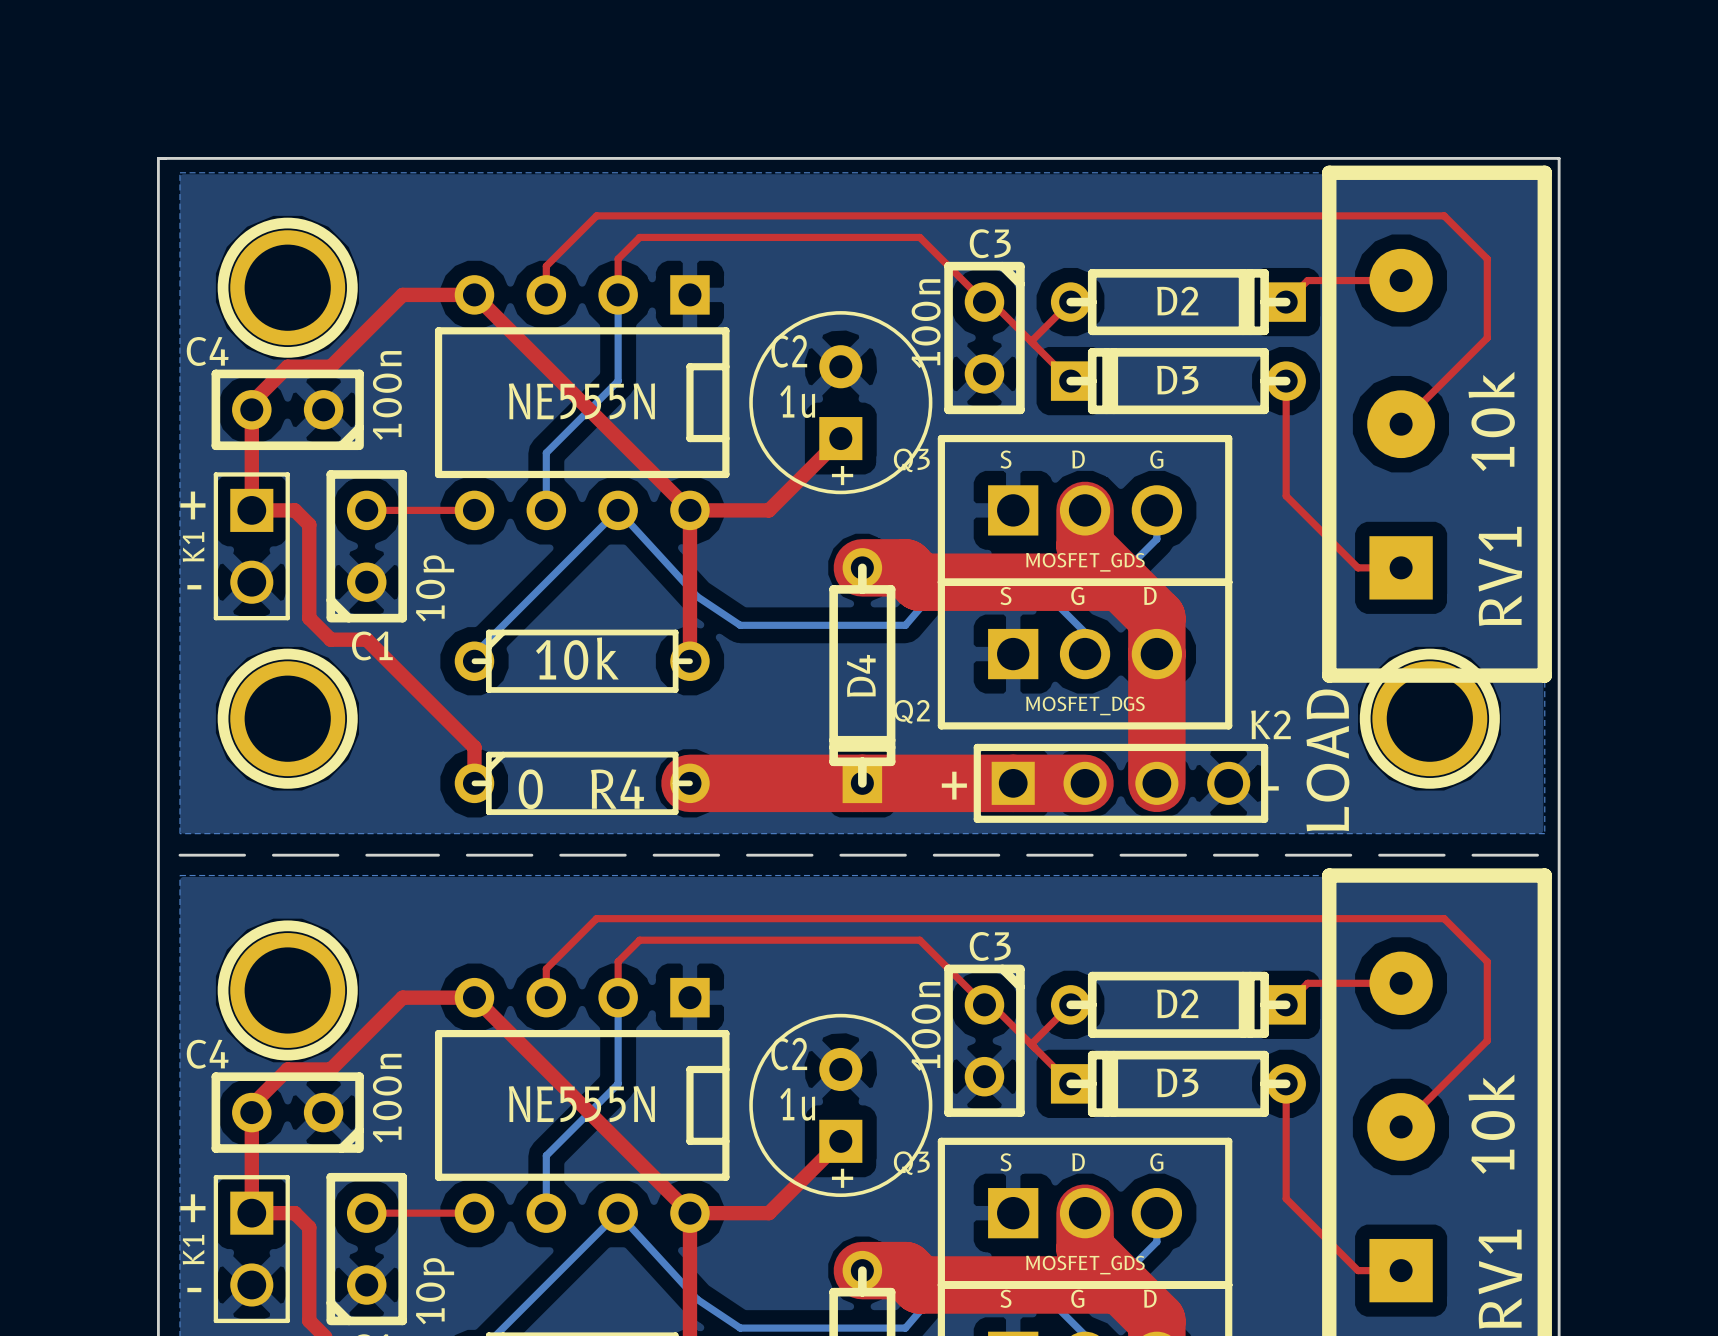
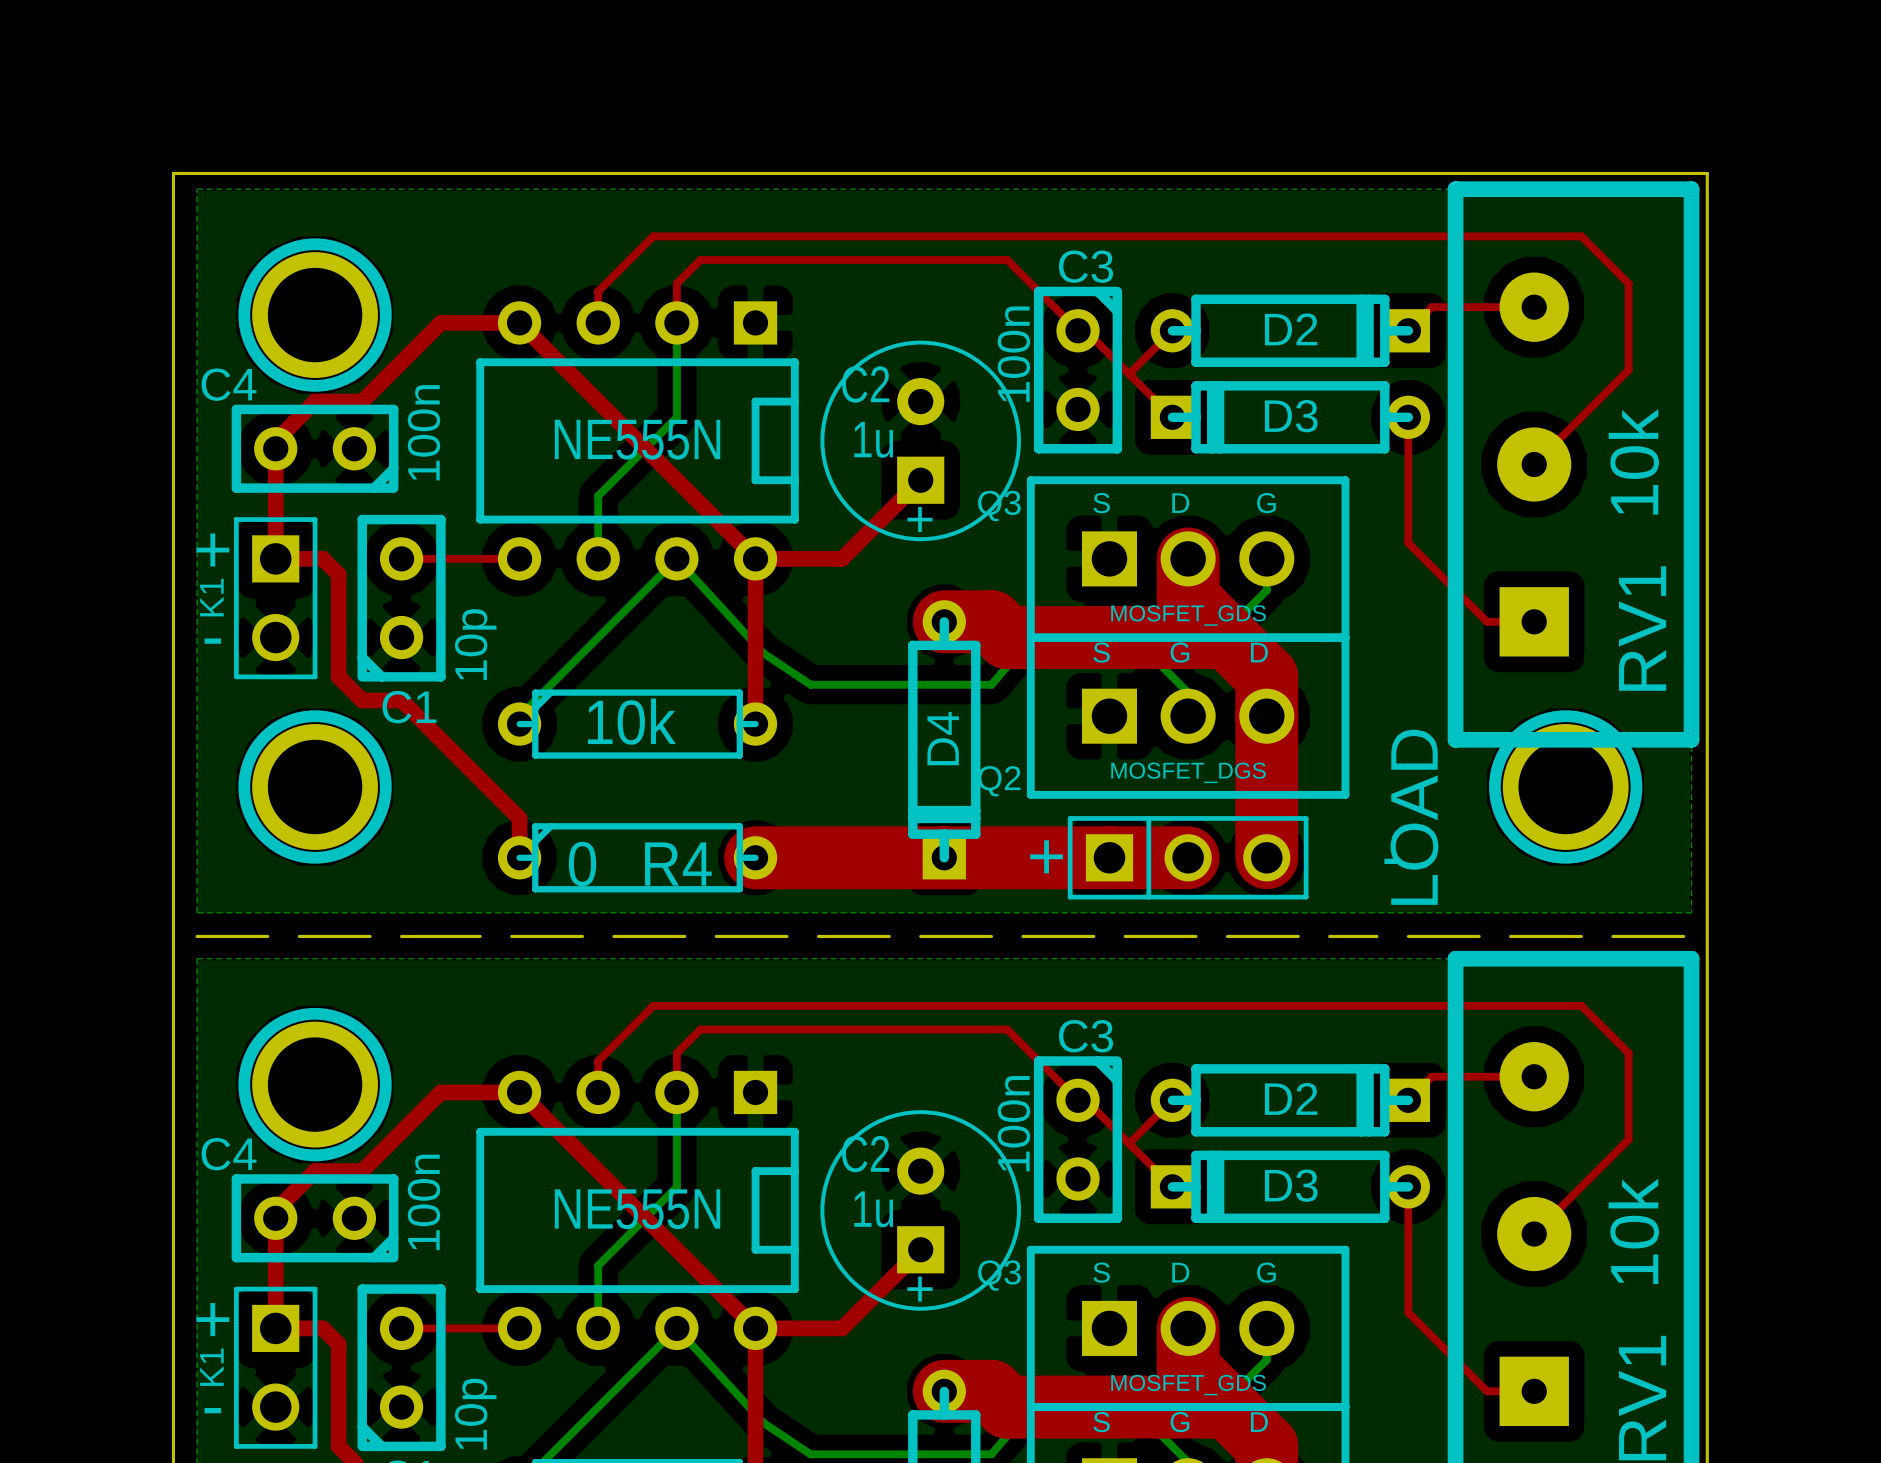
text position: LOAD (1327, 760) -> LOAD (1414, 817)
part: none -> (1188, 857)
K2: (1120, 783) -> none

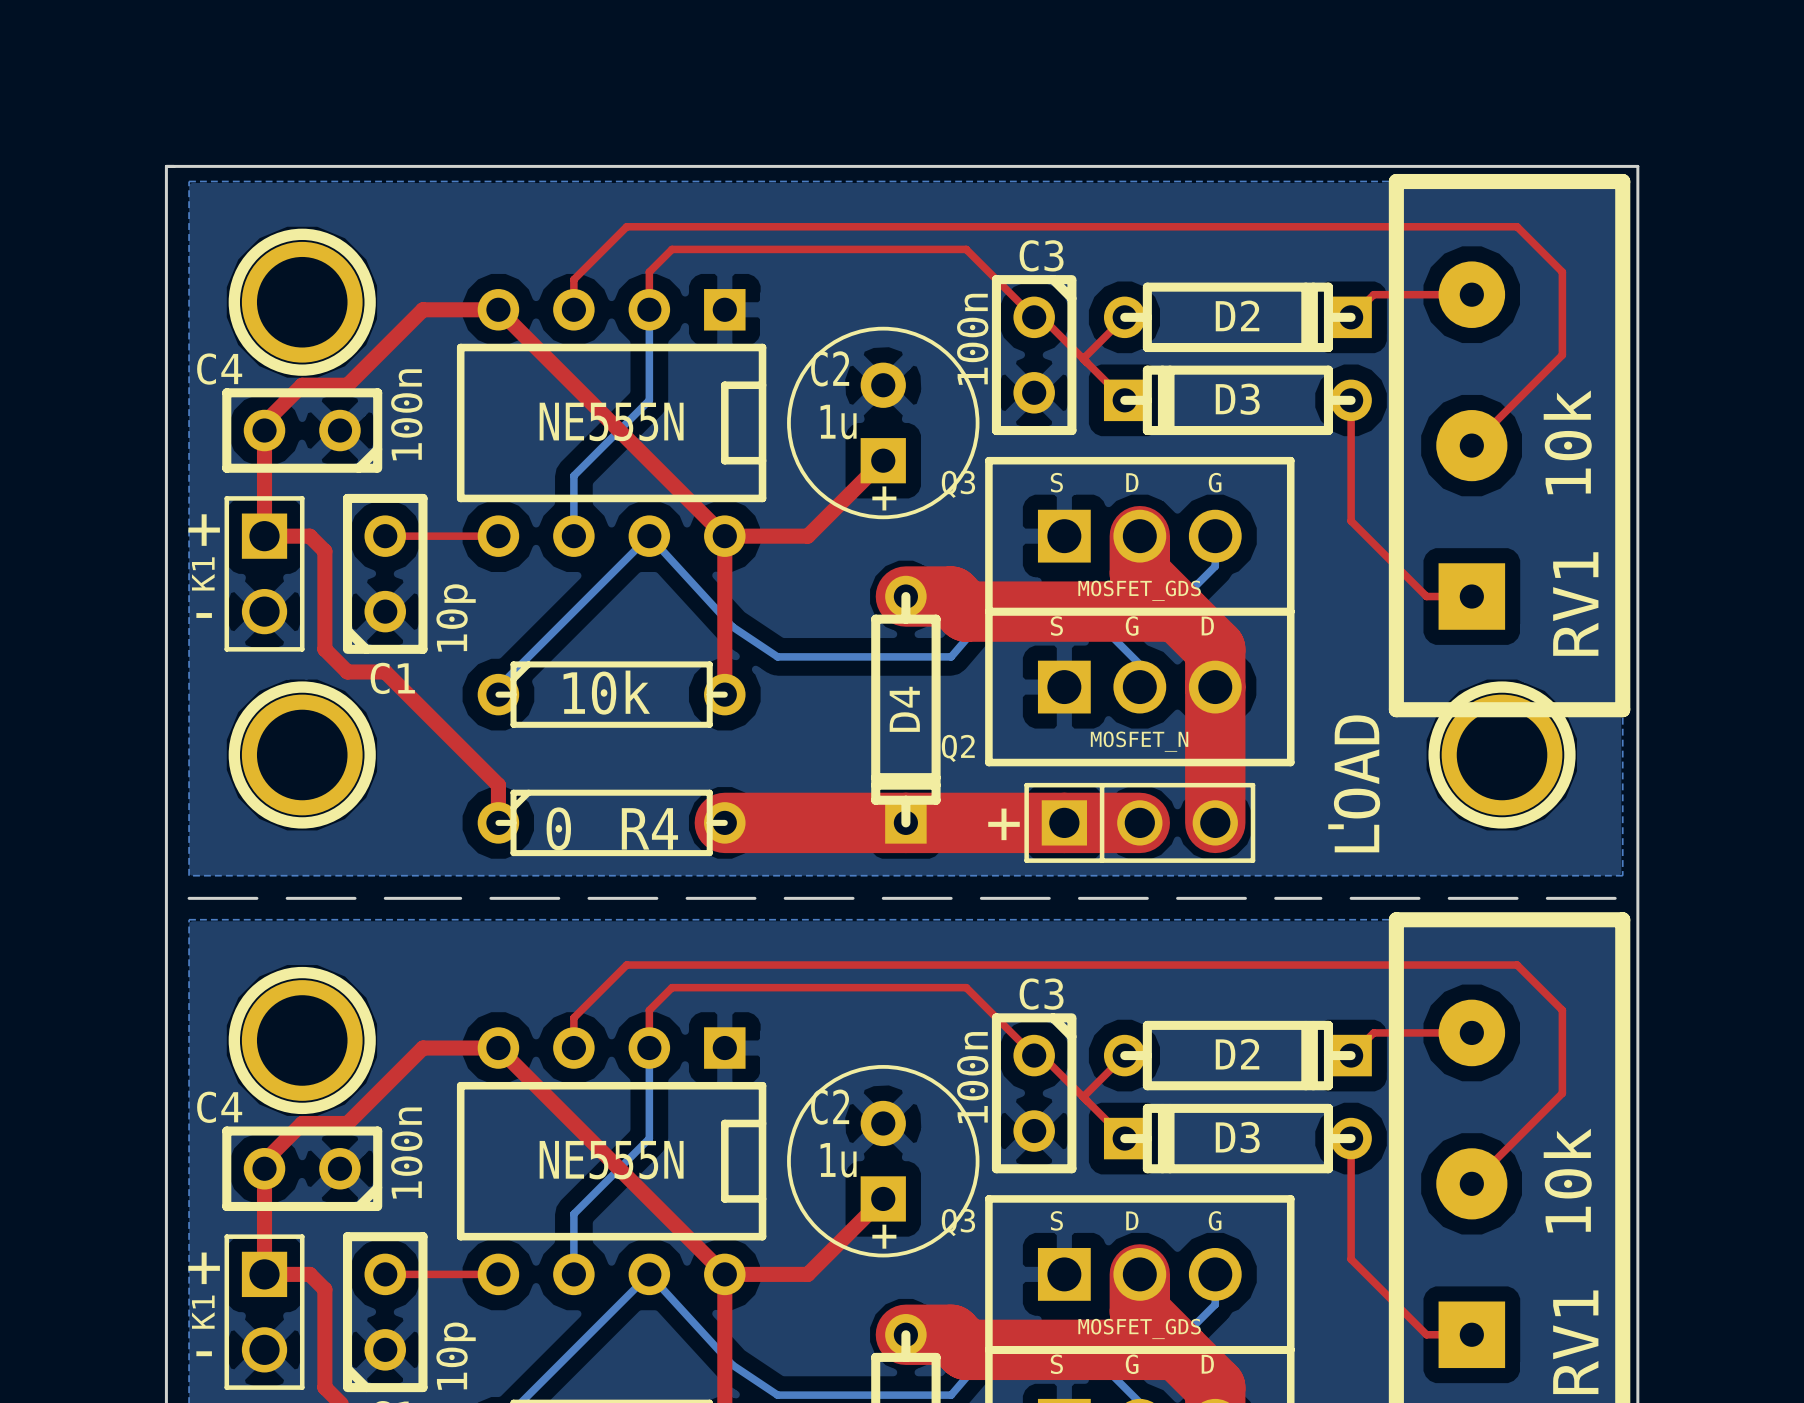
Q2 value: MOSFET_DGS (1188, 772) -> MOSFET_N (1139, 741)

